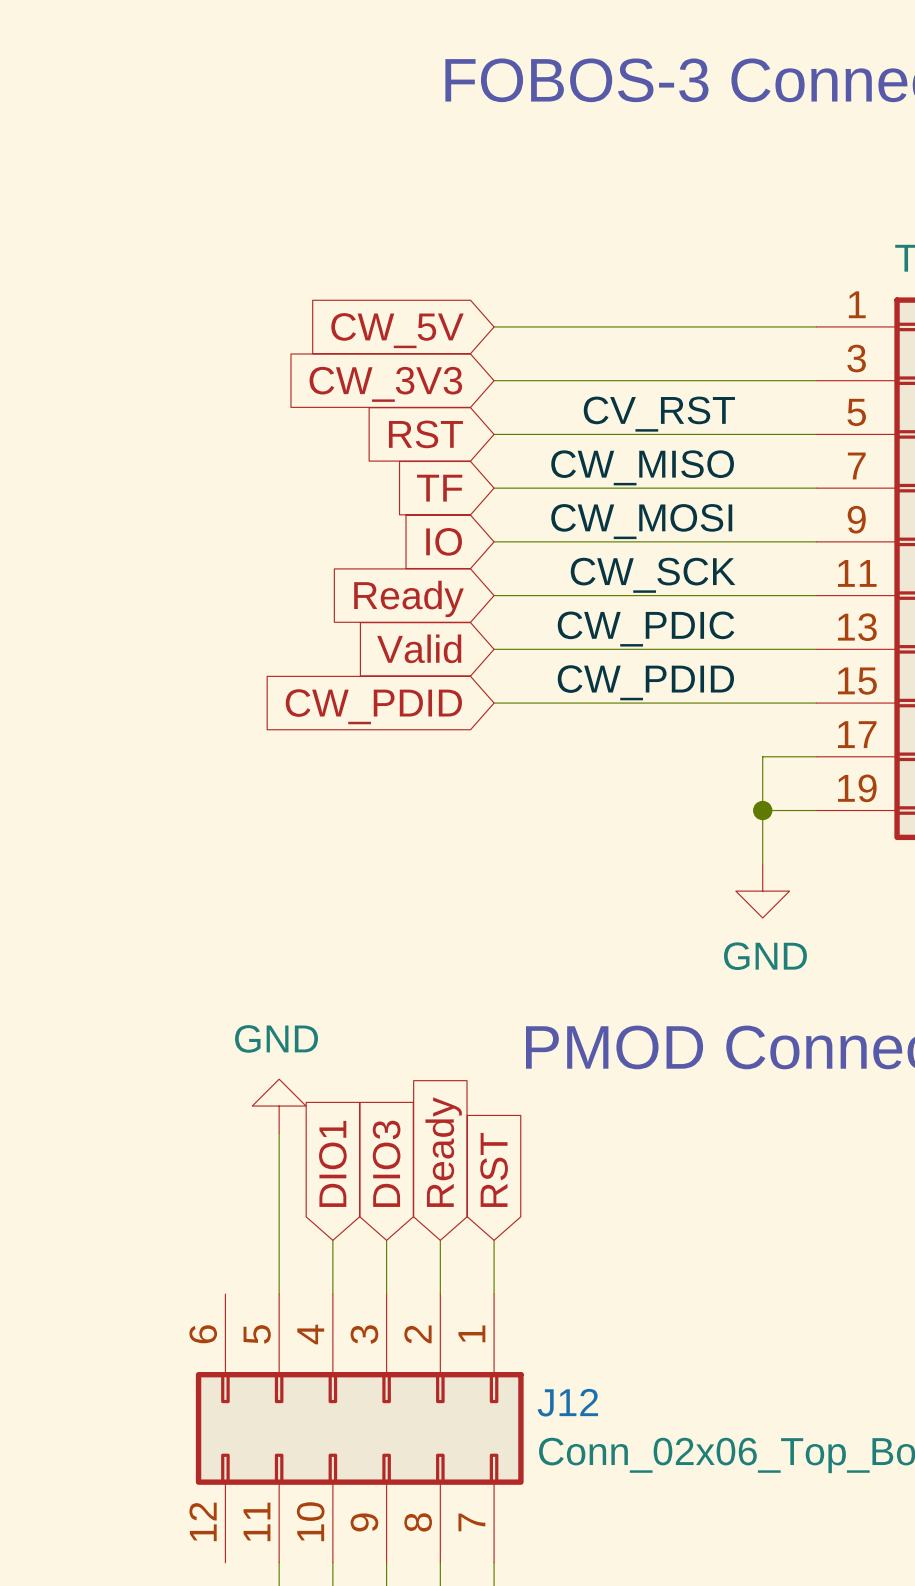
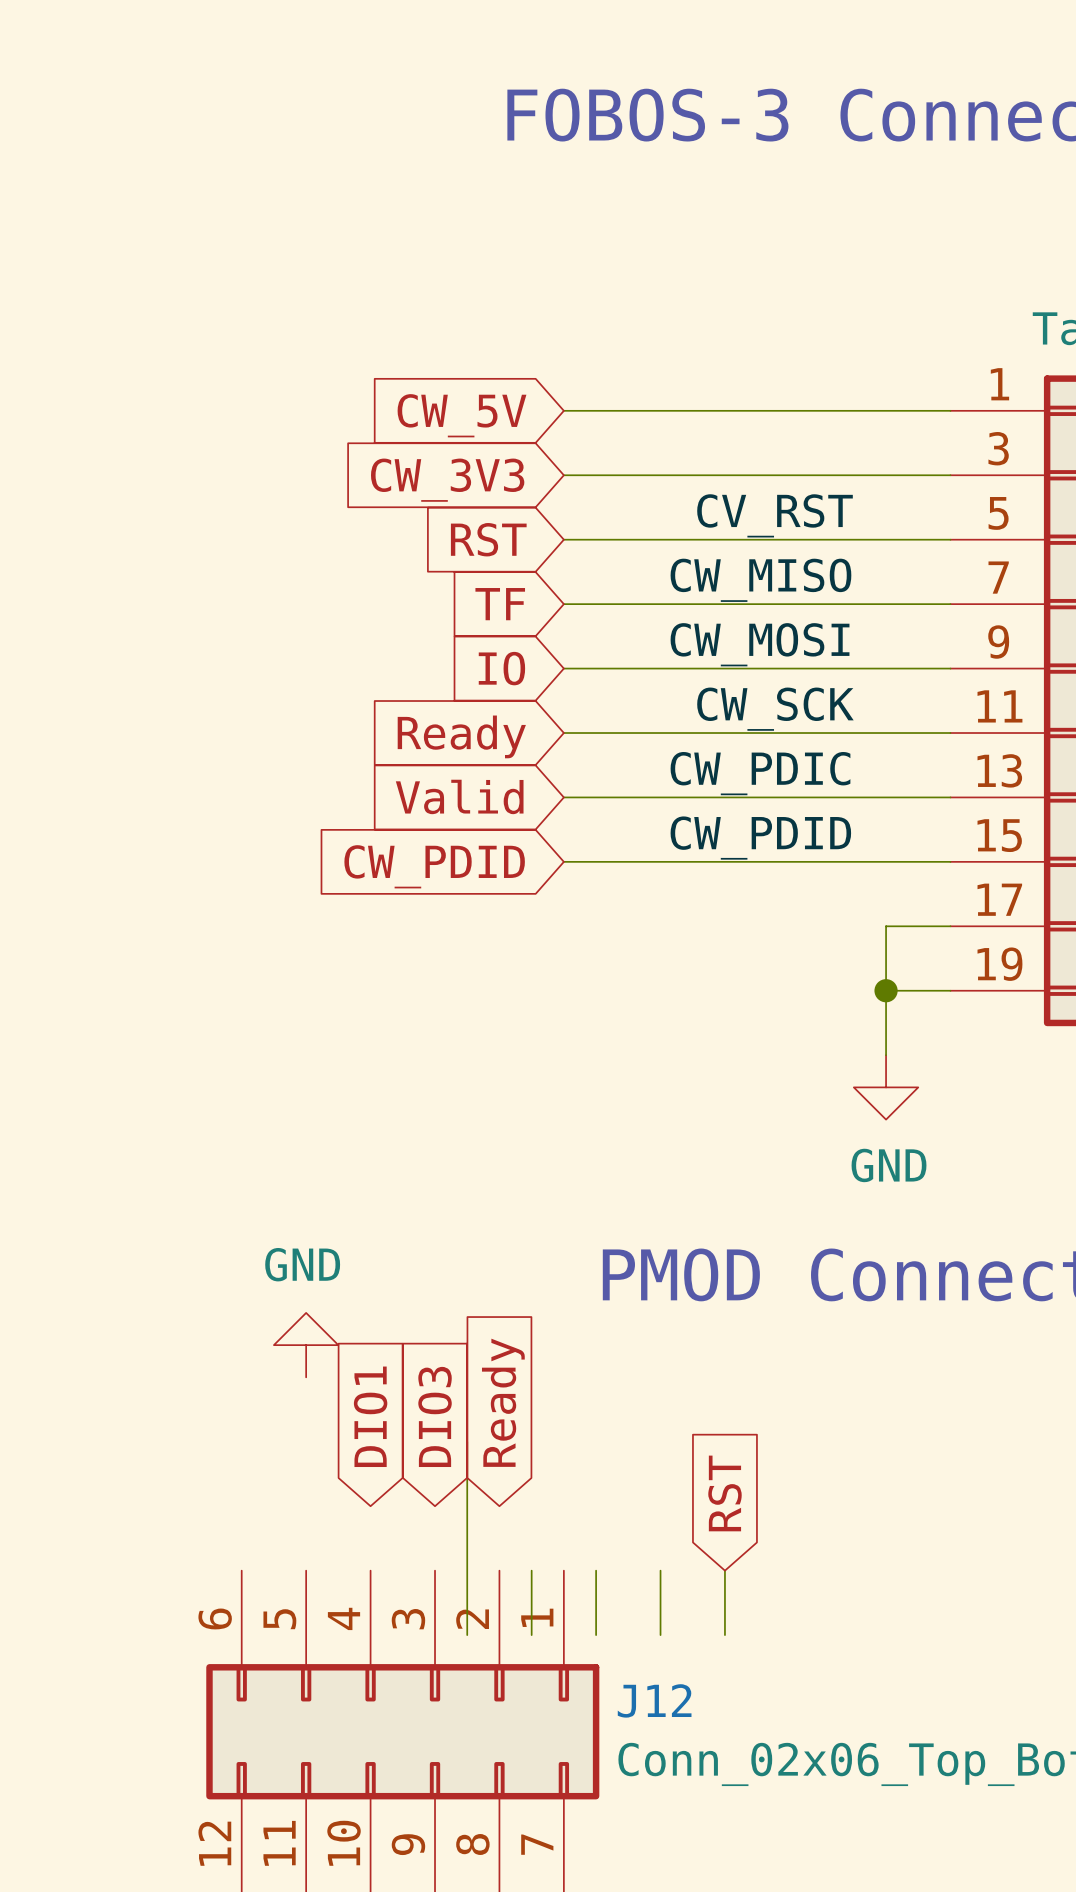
wire: (279, 1132) (279, 1294) -> (467, 1441) (467, 1635)
global label position: RST (494, 1169) -> RST (724, 1493)
wire: (332, 1240) (332, 1294) -> (531, 1570) (531, 1635)
wire: (386, 1240) (386, 1294) -> (596, 1570) (596, 1635)
wire: (440, 1240) (440, 1294) -> (660, 1570) (660, 1635)
wire: (494, 1240) (494, 1294) -> (724, 1570) (724, 1635)

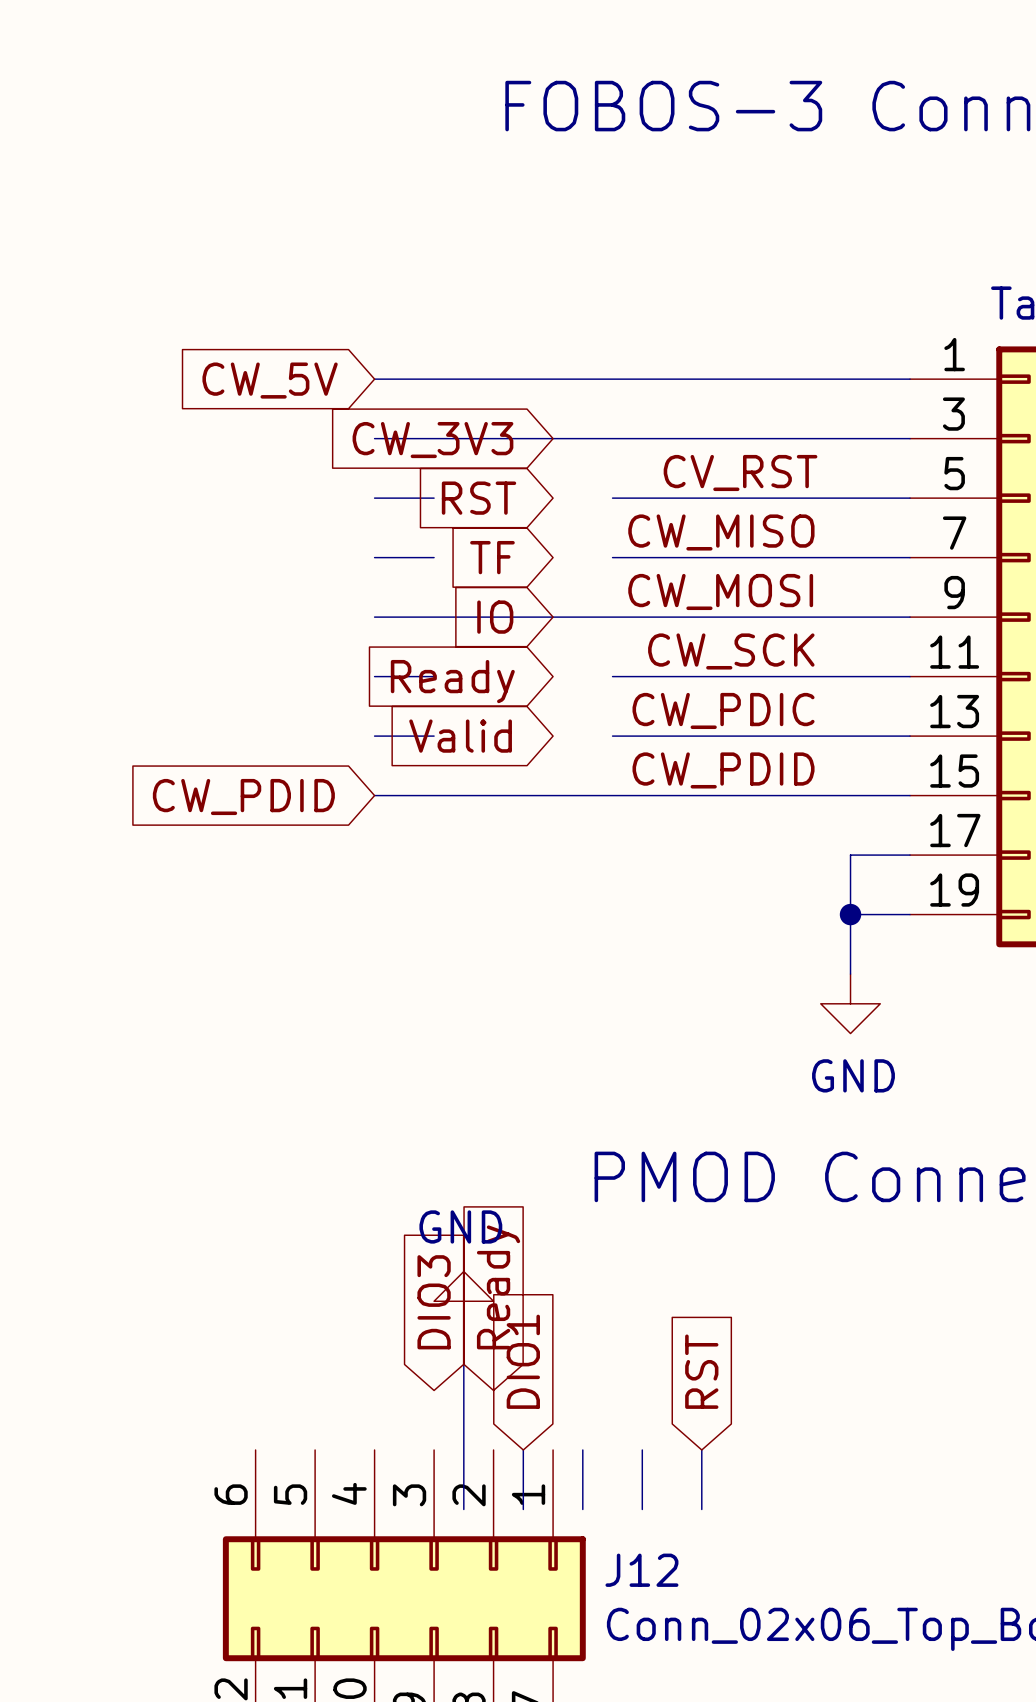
wire: none -> (374, 379) (553, 379)
global label position: CW_5V (462, 415) -> CW_5V (270, 380)
wire: none -> (374, 438) (553, 438)
wire: (563, 539) (628, 539) -> (374, 498) (434, 498)
wire: (563, 604) (628, 604) -> (374, 557) (434, 557)
wire: none -> (374, 617) (553, 617)
wire: (563, 733) (628, 733) -> (374, 676) (434, 676)
wire: (563, 797) (628, 797) -> (374, 736) (434, 736)
wire: none -> (374, 795) (553, 795)
global label position: CW_PDID (434, 866) -> CW_PDID (243, 797)
power symbol position: GND (306, 1345) -> GND (463, 1301)
global label position: DIO1 (370, 1416) -> DIO1 (523, 1361)

